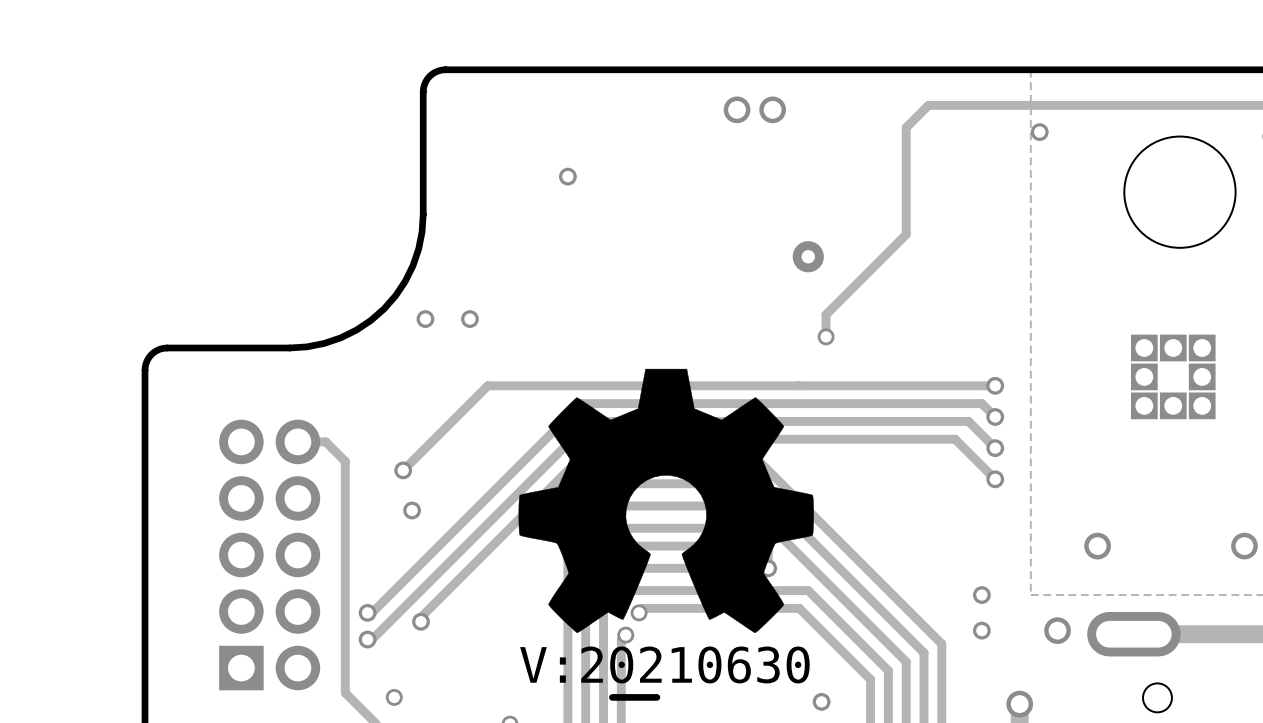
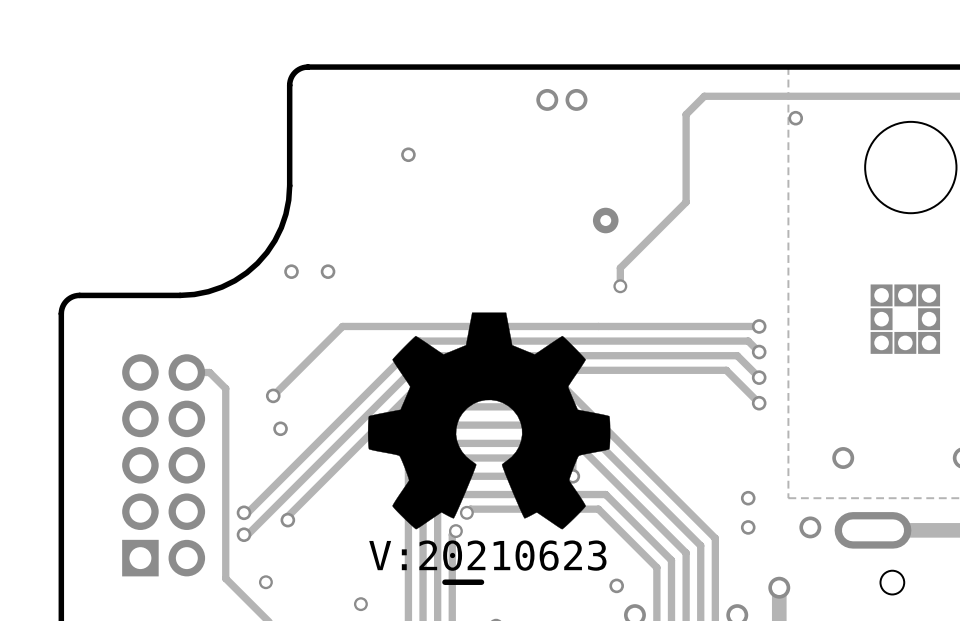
drawing shape: [520, 646, 810, 701] -> [369, 540, 607, 585]

